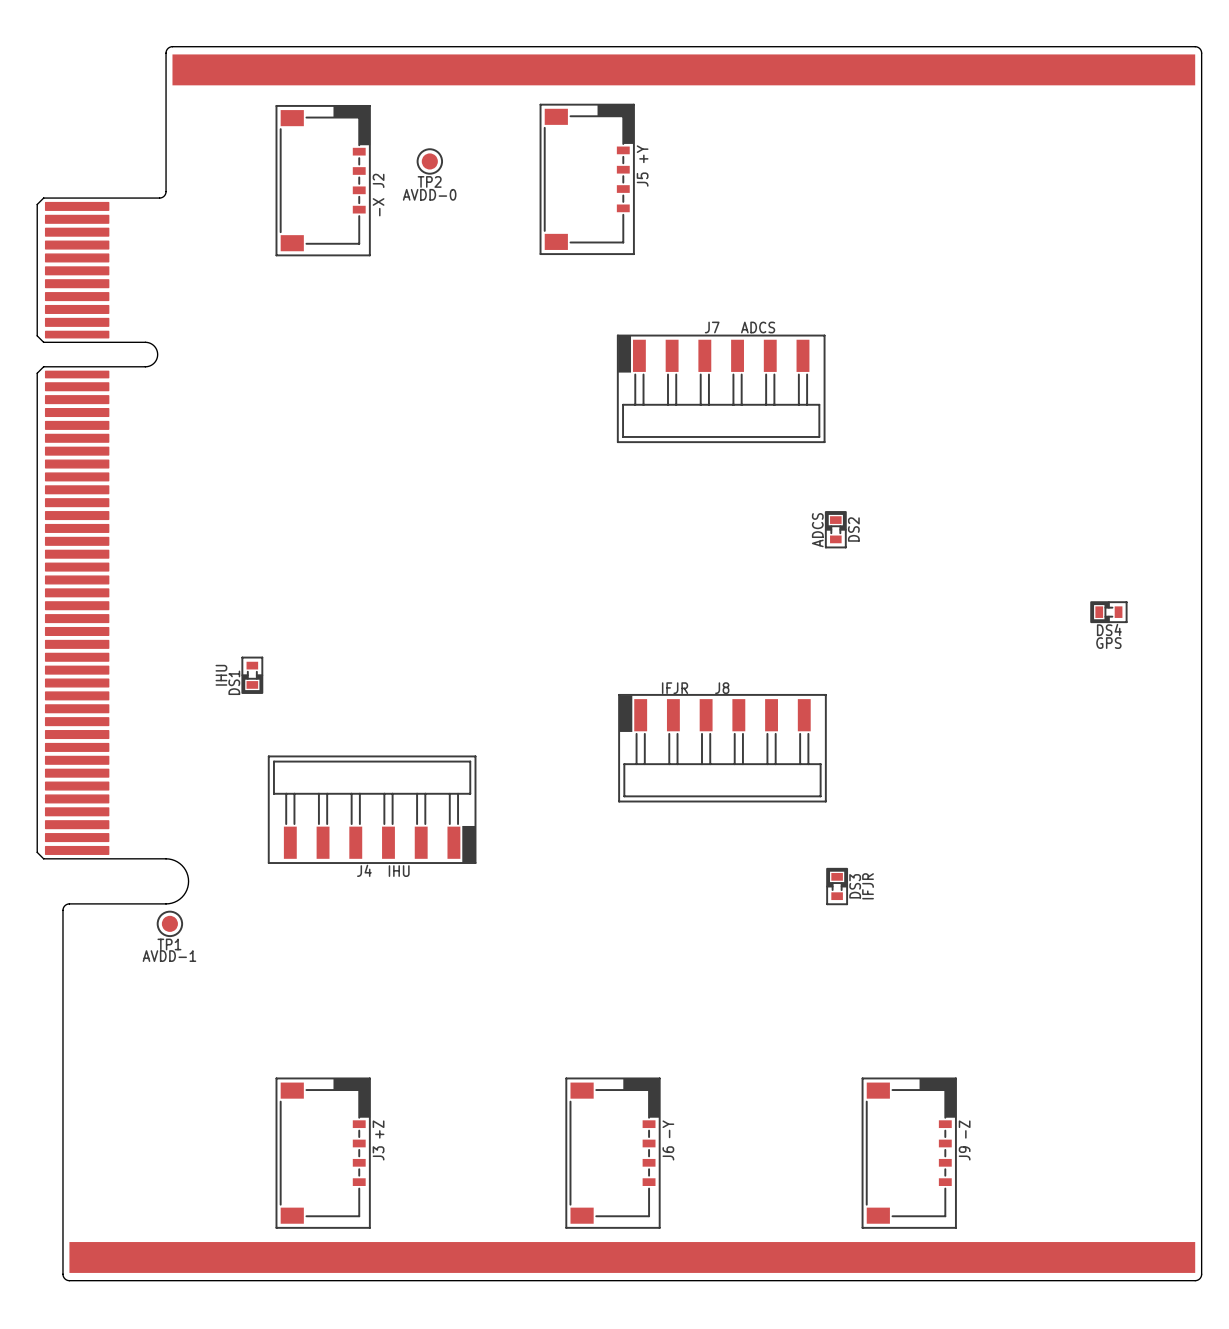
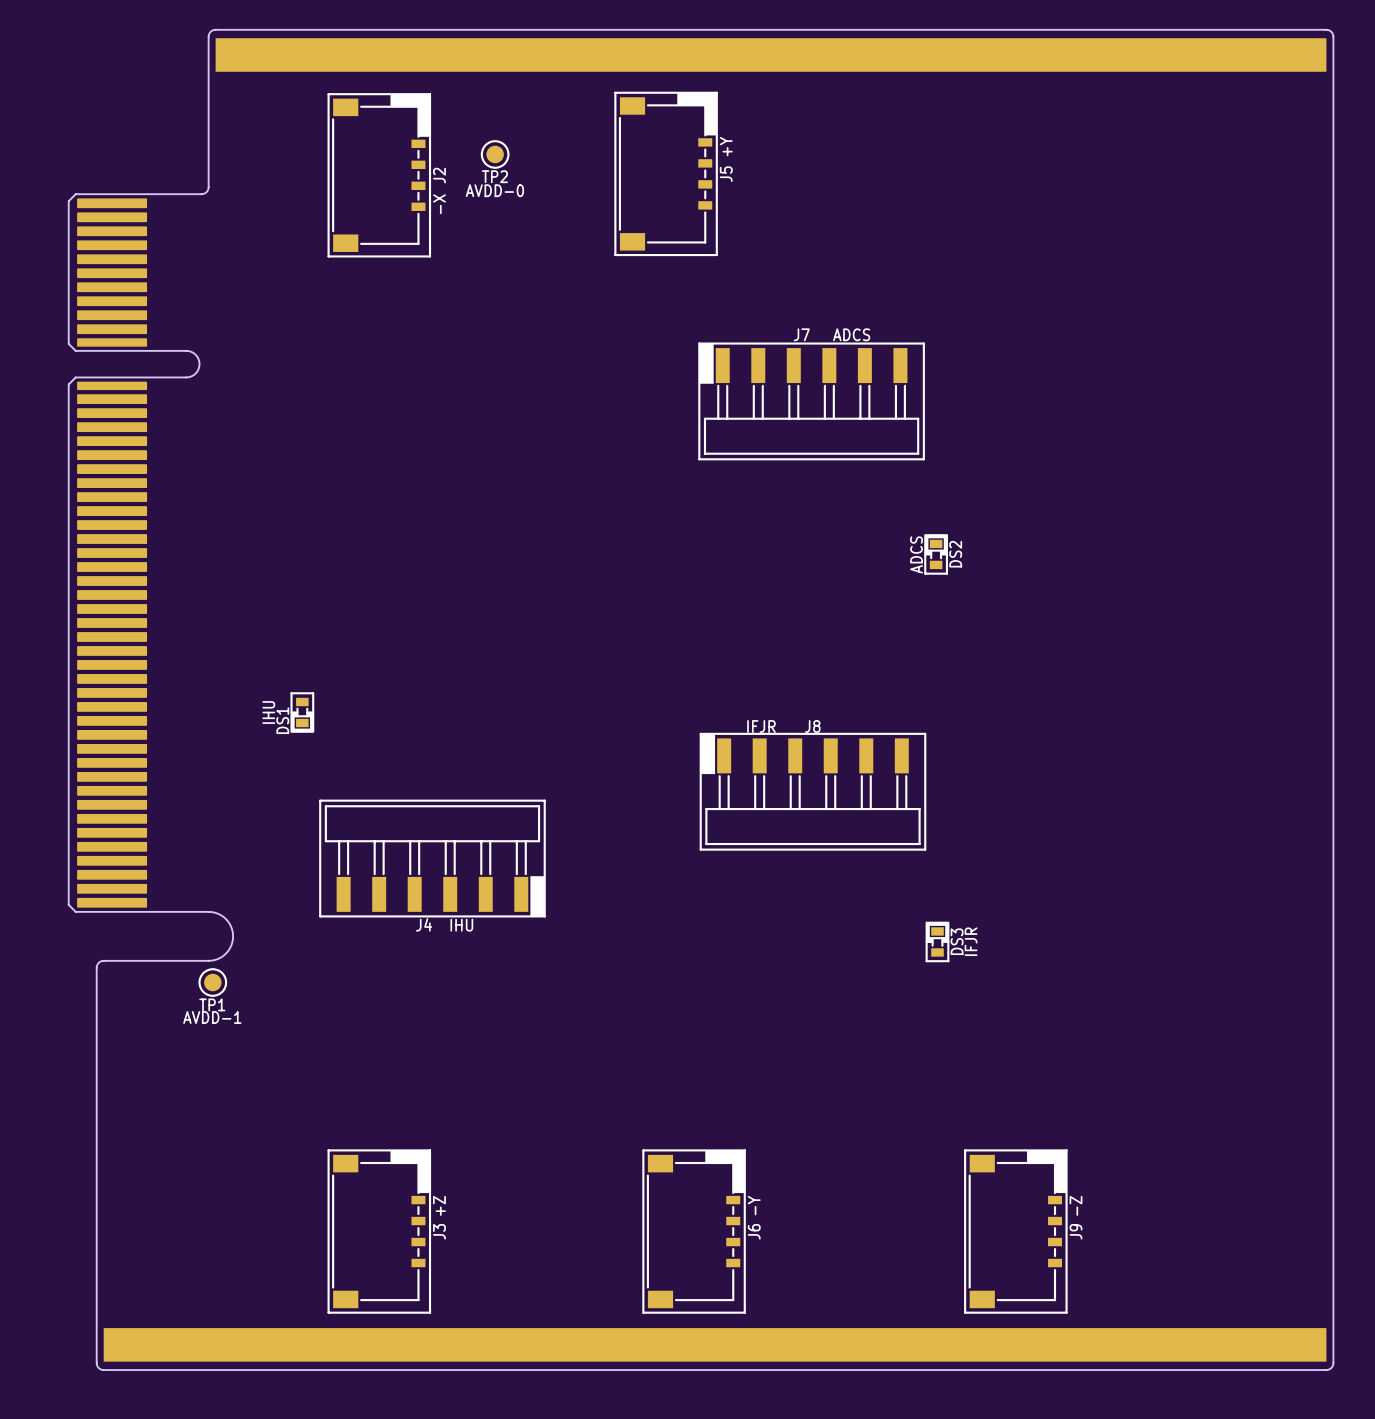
DS4: (1108, 612) -> none
text: GPS (1108, 643) -> none

